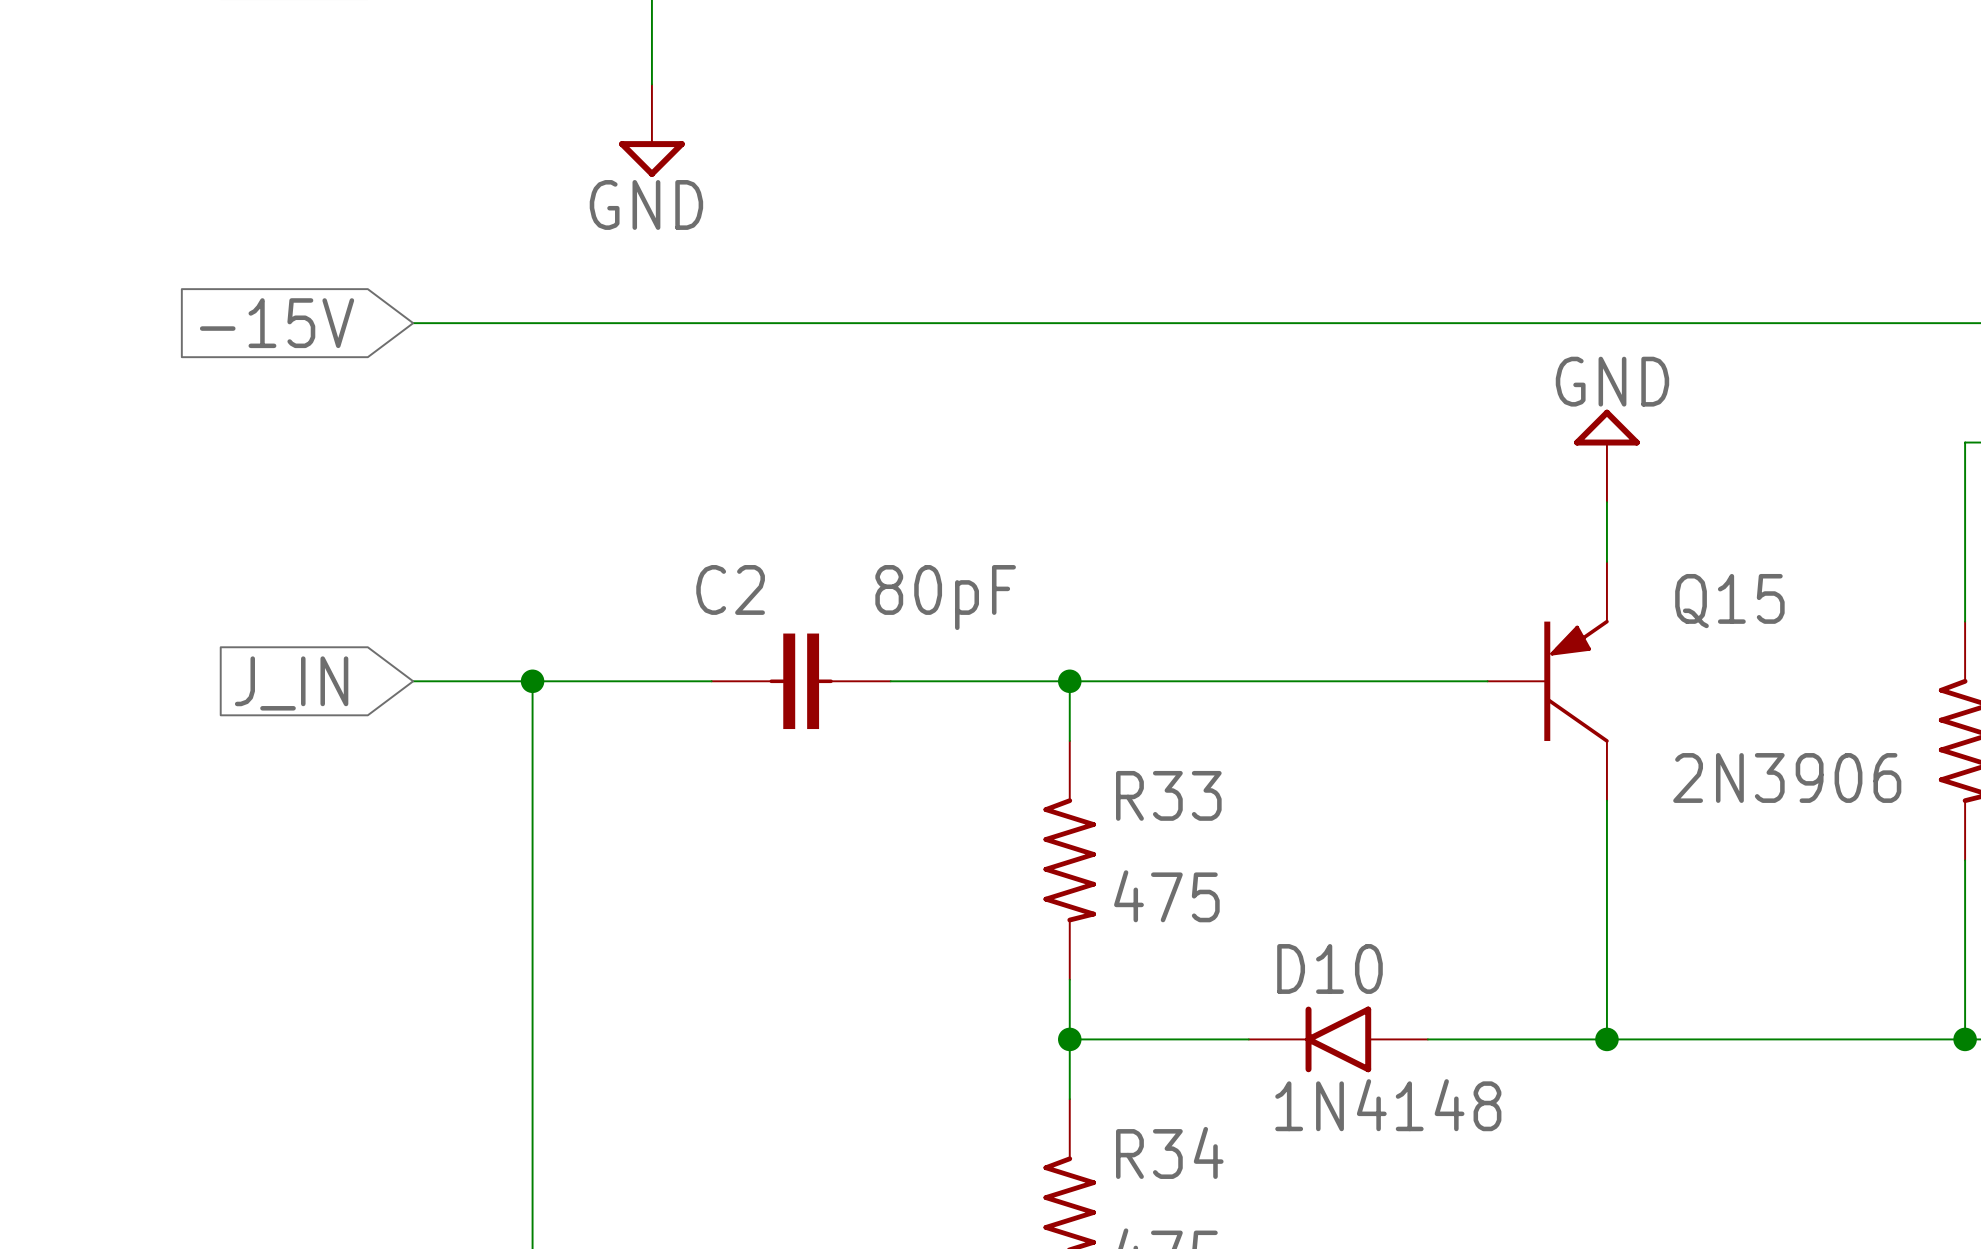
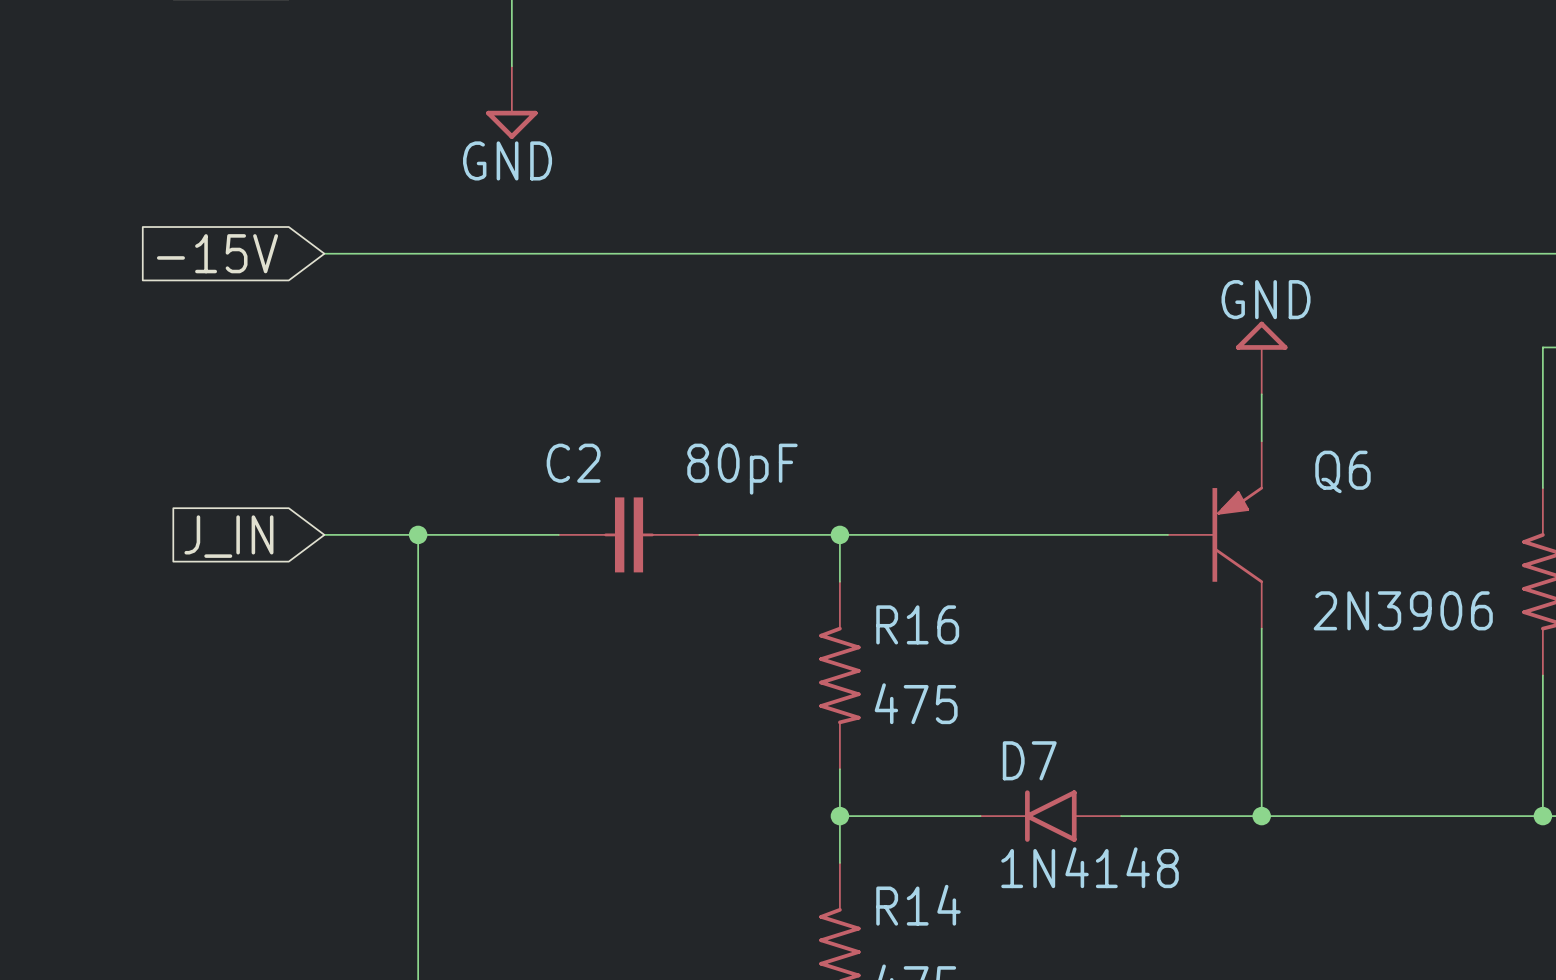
Q15 name: Q15 (1729, 601) -> Q6 (1342, 471)
R33 name: R33 (1168, 795) -> R16 (917, 624)
D10 name: D10 (1329, 968) -> D7 (1029, 760)
R34 name: R34 (1169, 1152) -> R14 (918, 905)

